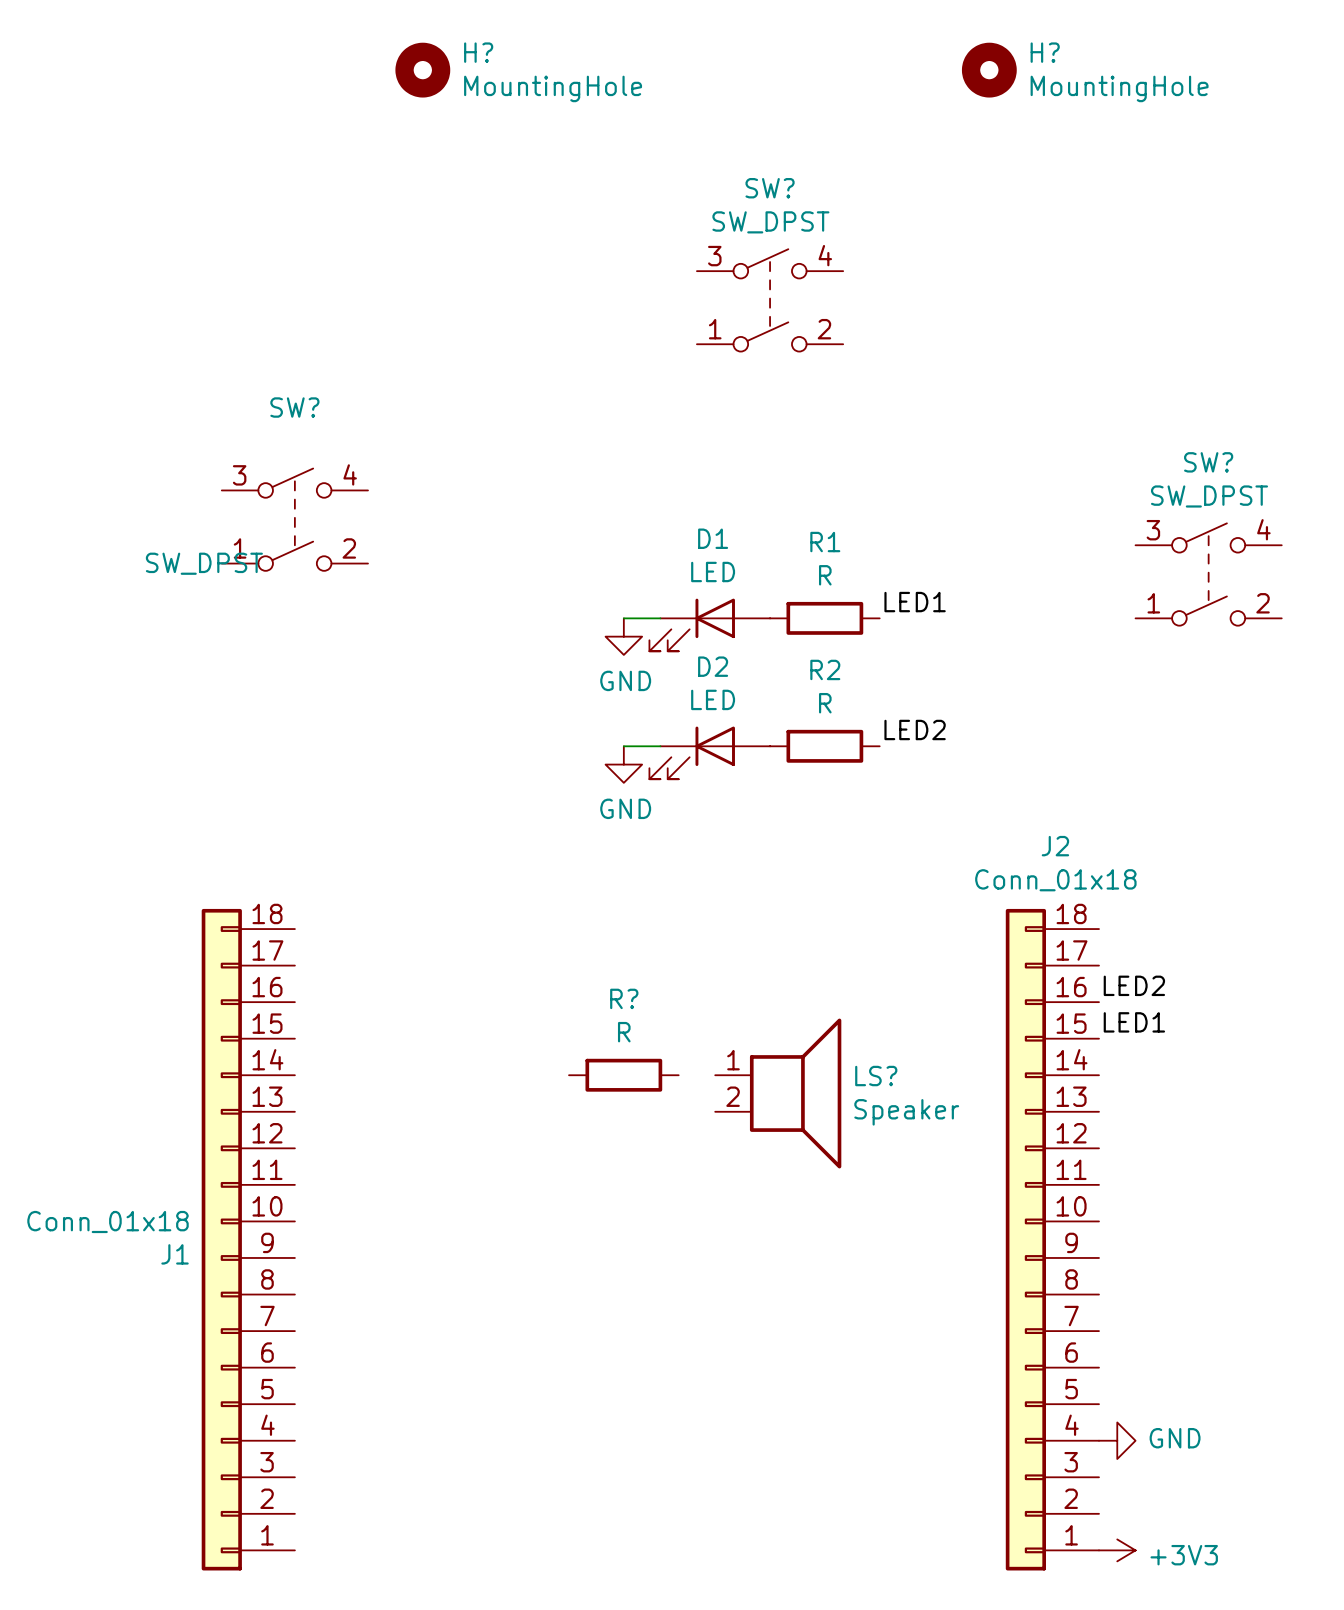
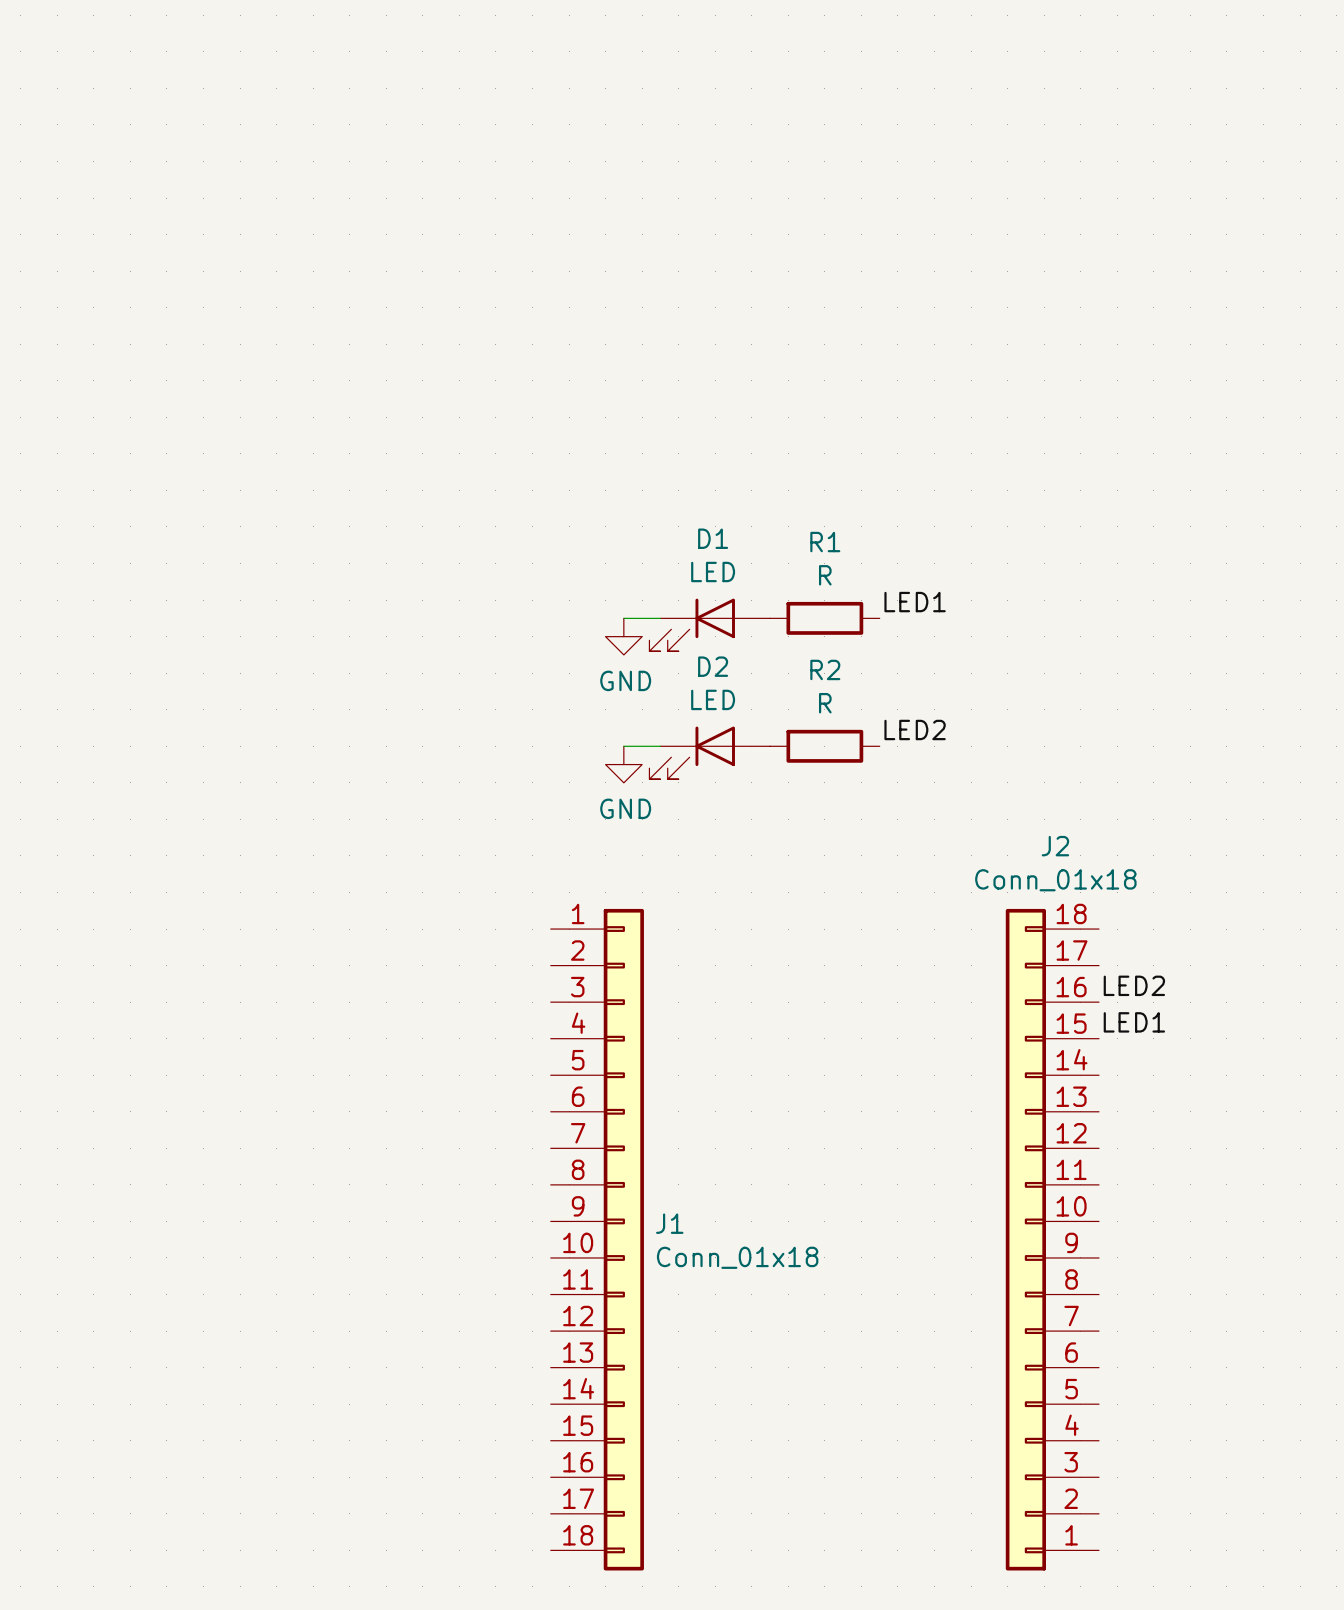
H?: MountingHole (422, 70) -> none
H?: MountingHole (989, 70) -> none
SW?: SW_DPST (770, 300) -> none
SW?: SW_DPST (294, 519) -> none
SW?: SW_DPST (1208, 574) -> none
R?: R (623, 1075) -> none
LS?: Speaker (778, 1093) -> none
J1 rotation: 0° (221, 1239) -> 180° (623, 1239)
power symbol: GND (1117, 1440) -> none
power symbol: +3V3 (1117, 1550) -> none

